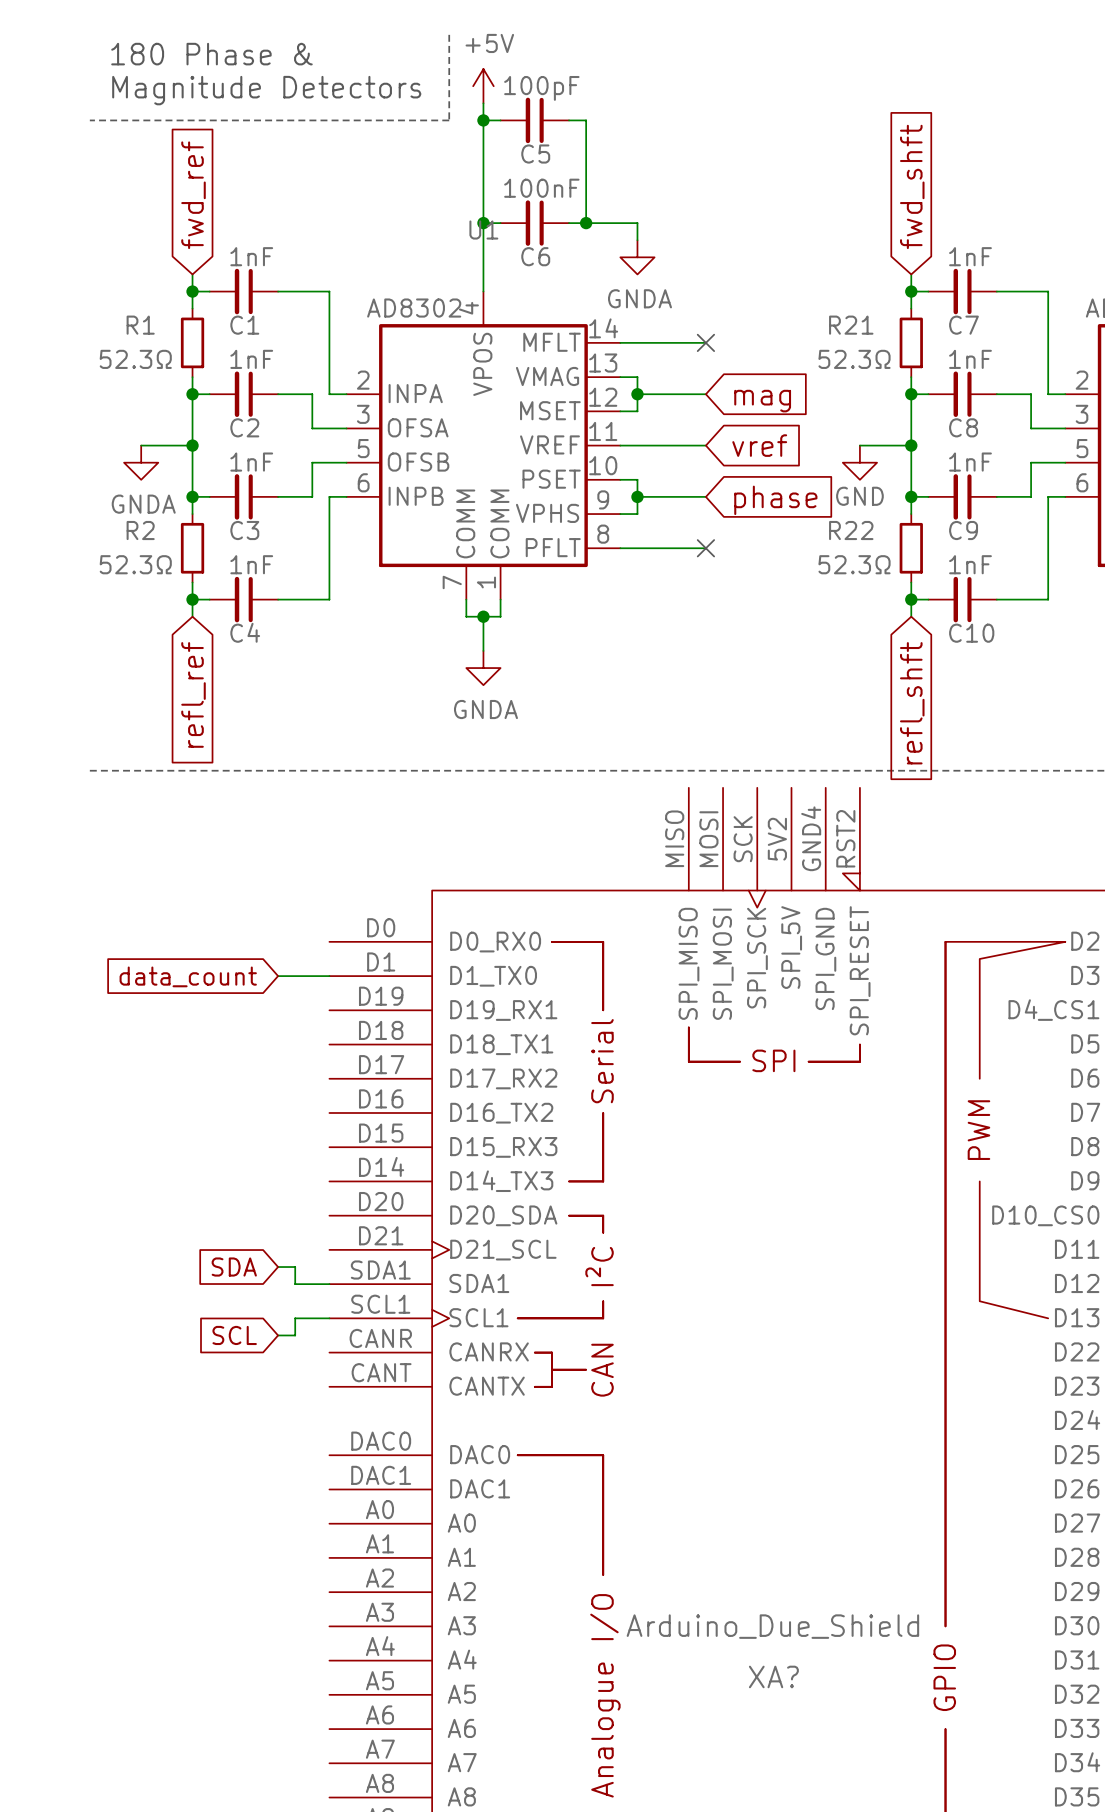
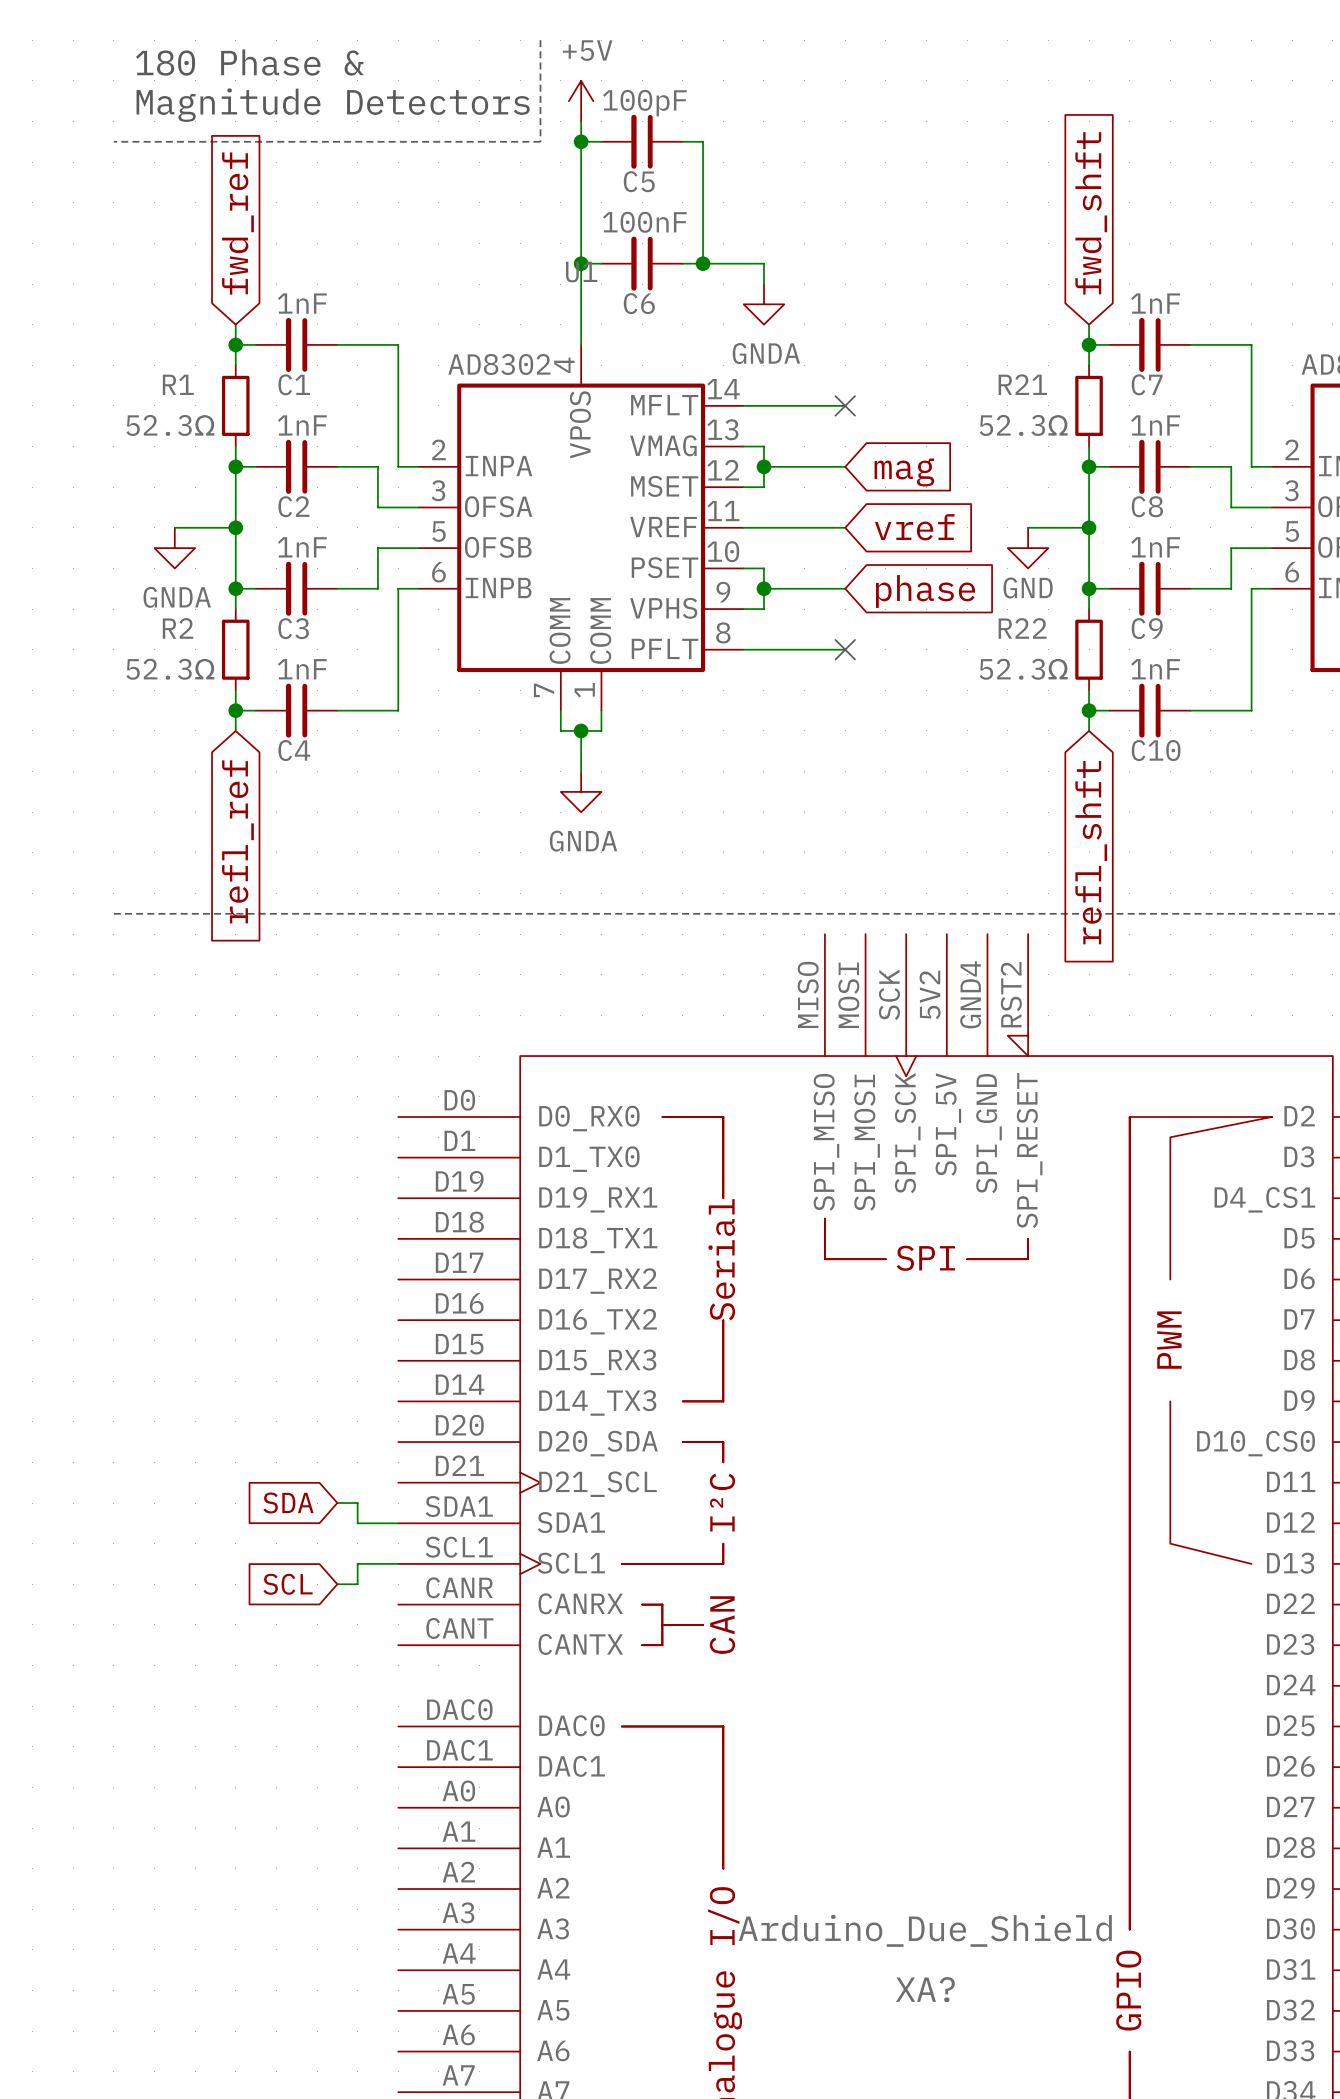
global label: data_count (188, 976) -> none
wire: (278, 976) (329, 976) -> none

